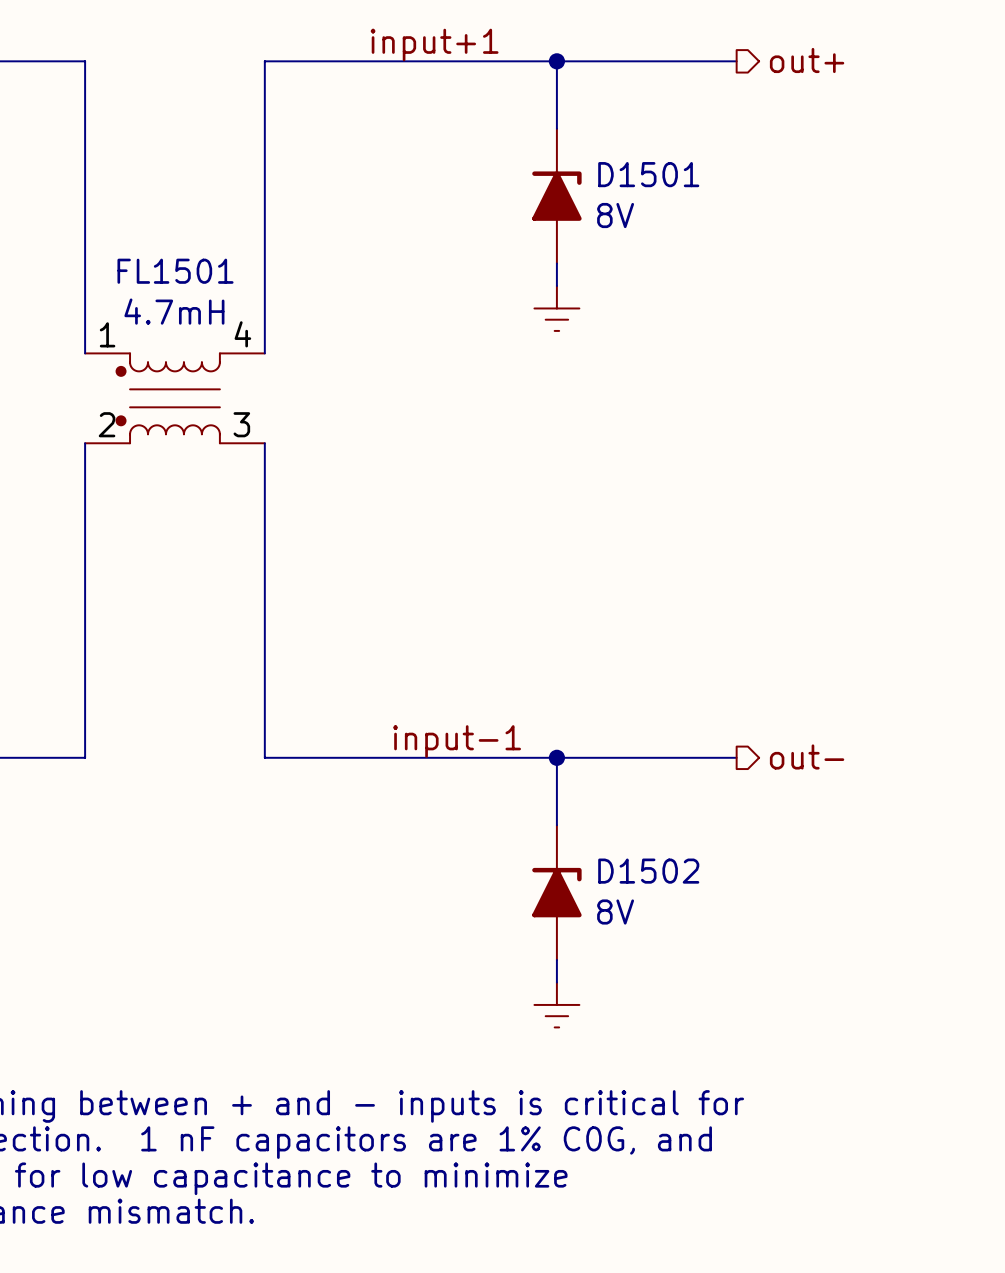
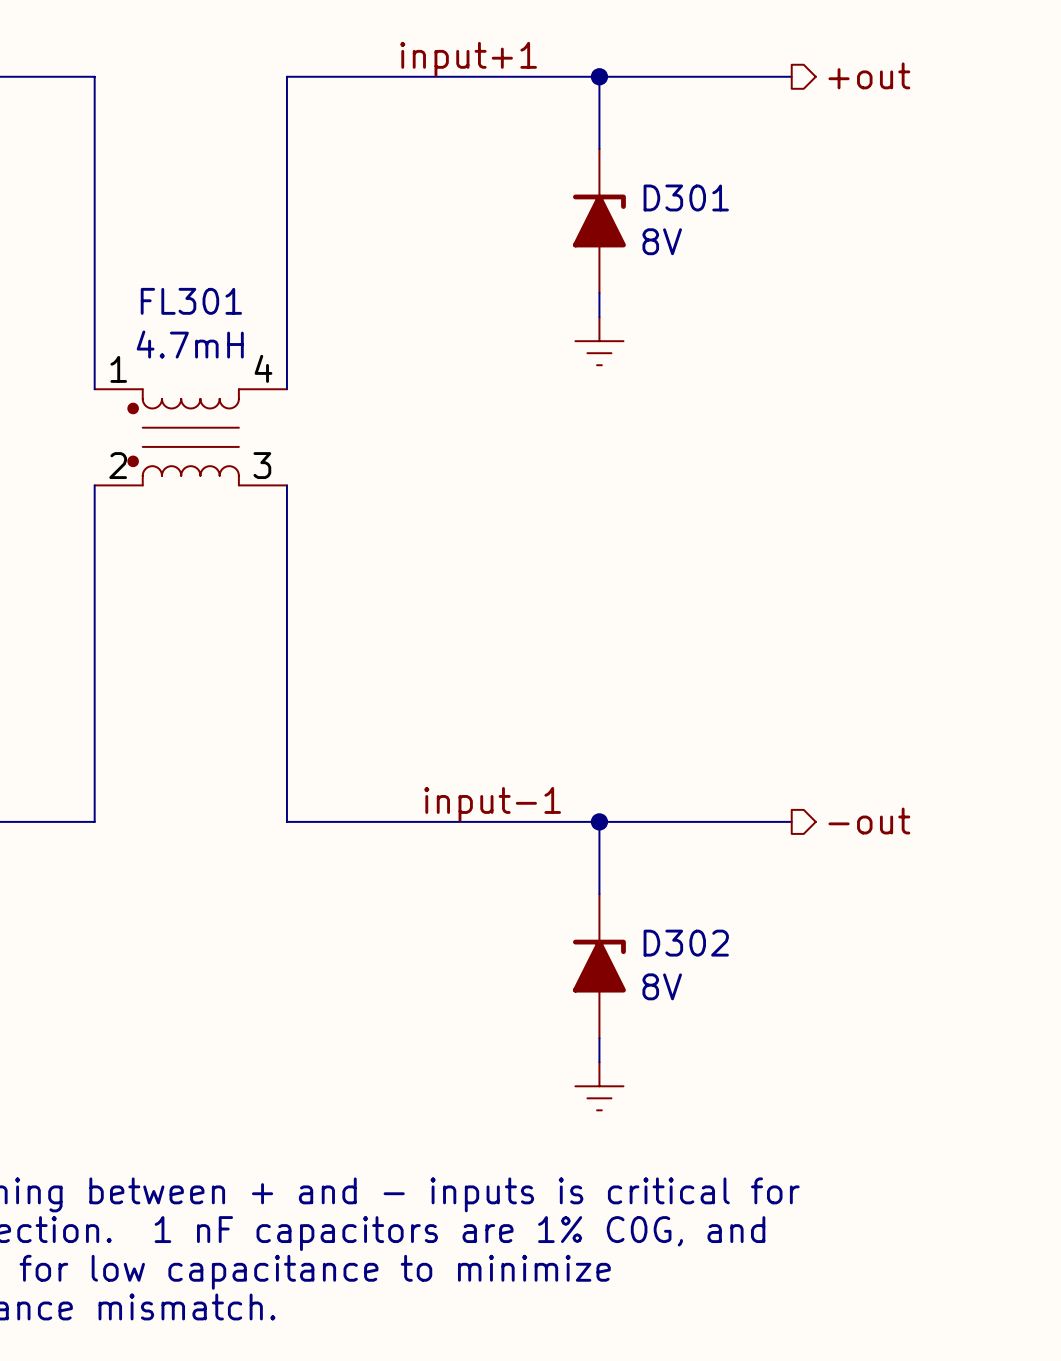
hierarchical label: out+ (807, 60) -> +out (869, 75)
D1501 name: D1501 (648, 174) -> D301 (686, 197)
FL1501 name: FL1501 (175, 271) -> FL301 (191, 301)
hierarchical label: out- (807, 756) -> -out (869, 821)
D1502 name: D1502 (648, 871) -> D302 (686, 943)

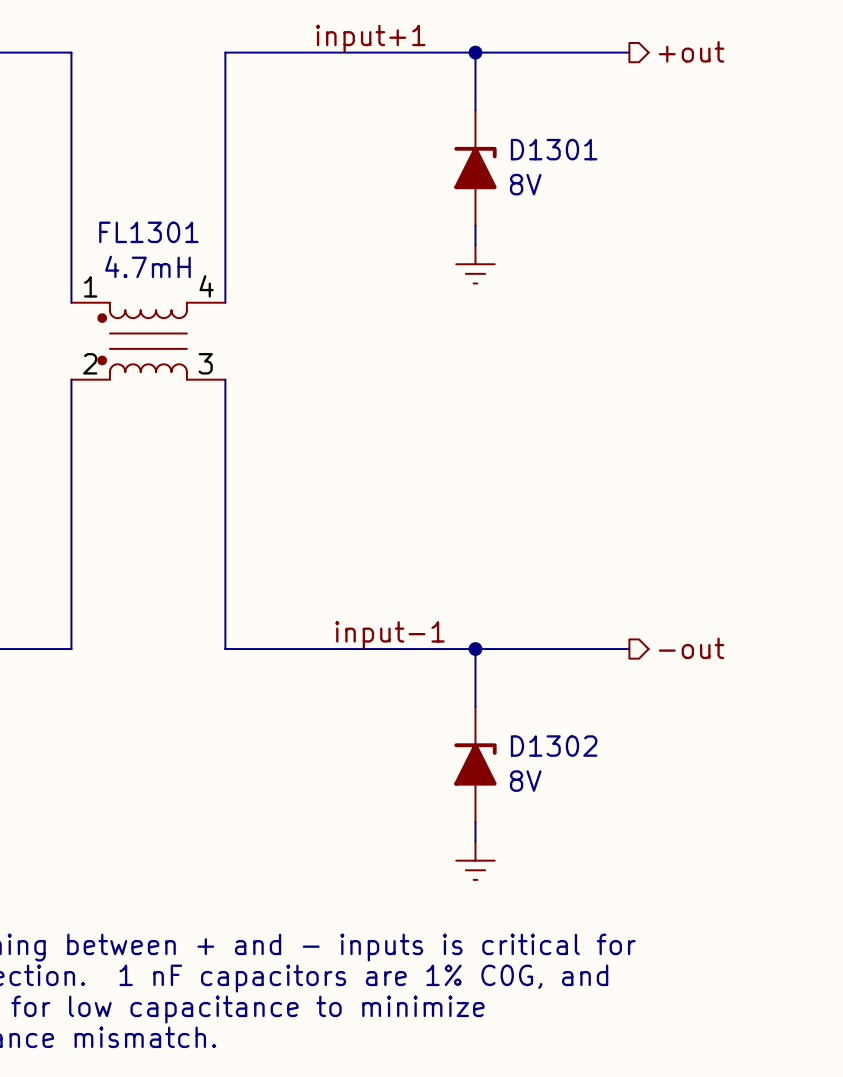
D301 name: D301 (686, 197) -> D1301 (554, 149)
FL301 name: FL301 (191, 301) -> FL1301 (148, 232)
D302 name: D302 (686, 943) -> D1302 (554, 746)

